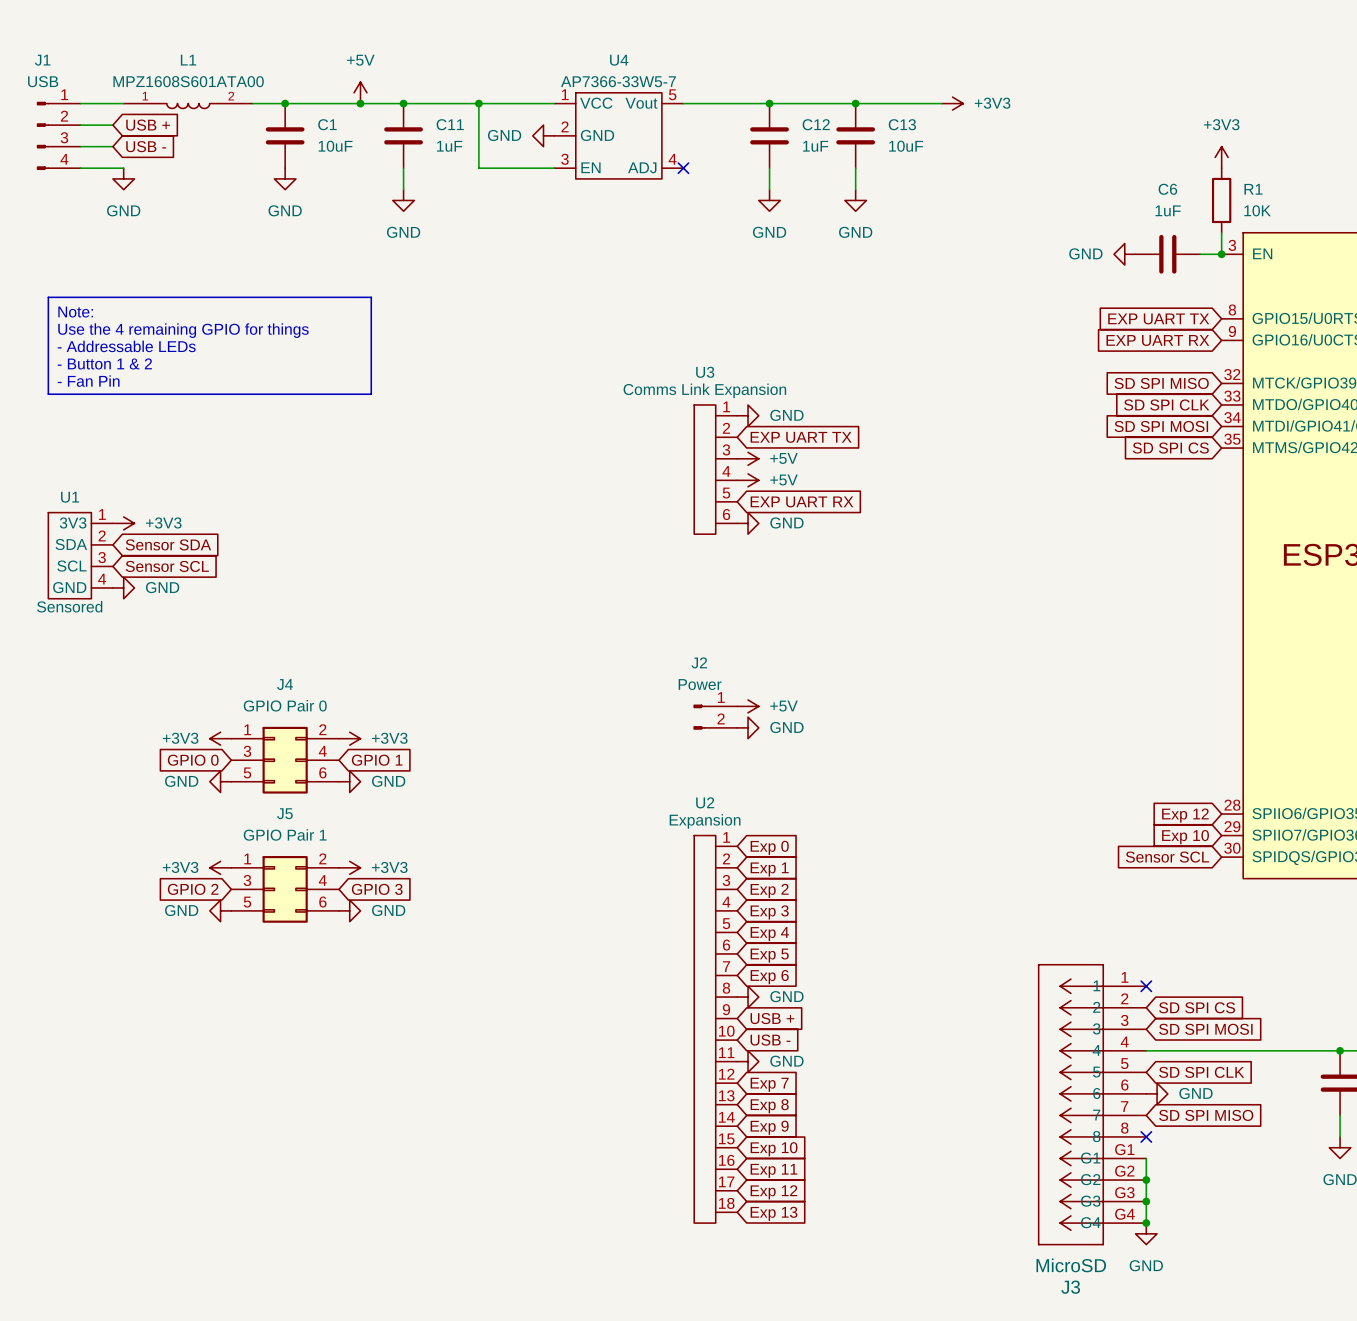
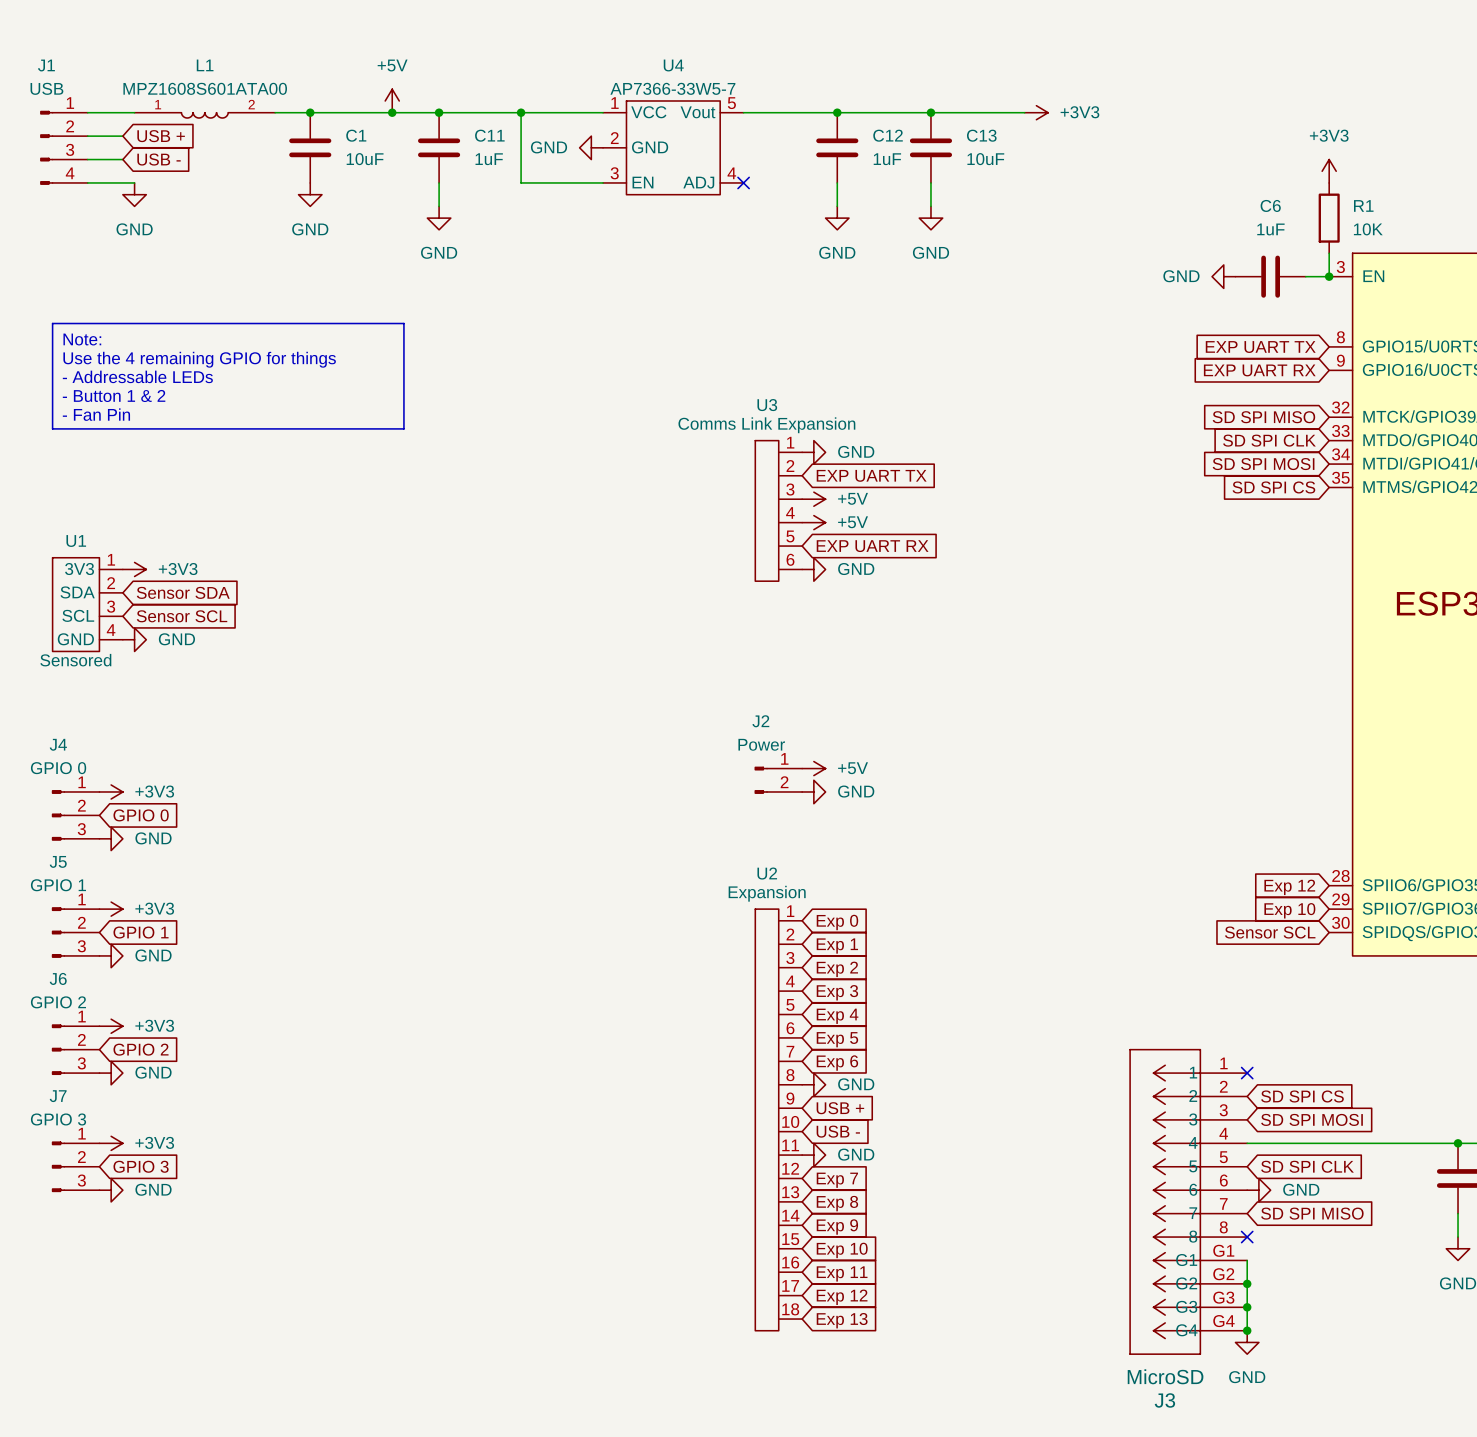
J4 name position: J4 (285, 684) -> J4 (58, 744)
J4 value: GPIO Pair 0 (285, 705) -> GPIO 0 (58, 768)
J4 symbol: [231, 726, 339, 794] -> [51, 790, 100, 841]
power symbol: none -> +3V3 (111, 791)
power symbol: +3V3 (220, 738) -> none
power symbol: +3V3 (349, 738) -> none
global label rotation: 0° (193, 760) -> 180° (141, 815)
global label: GPIO 1 (377, 760) -> none
power symbol: none -> GND (111, 838)
power symbol: GND (220, 781) -> none
power symbol: GND (349, 781) -> none
J5 name position: J5 (284, 813) -> J5 (58, 861)
J5 value: GPIO Pair 1 (285, 834) -> GPIO 1 (58, 885)
power symbol: none -> +3V3 (111, 909)
J5 symbol: [231, 856, 339, 923] -> [51, 907, 100, 958]
global label: none -> GPIO 1 (141, 932)
power symbol: +3V3 (220, 867) -> none
power symbol: +3V3 (349, 867) -> none
power symbol: none -> GND (111, 955)
global label rotation: 0° (193, 889) -> 180° (141, 1049)
global label: GPIO 3 (377, 889) -> none
power symbol: GND (220, 910) -> none
power symbol: GND (349, 910) -> none
power symbol: none -> +3V3 (111, 1026)
J6: none -> GPIO 2 (75, 1049)
power symbol: none -> GND (111, 1073)
power symbol: none -> +3V3 (111, 1143)
J7: none -> GPIO 3 (75, 1166)
global label: none -> GPIO 3 (141, 1166)
power symbol: none -> GND (111, 1190)

